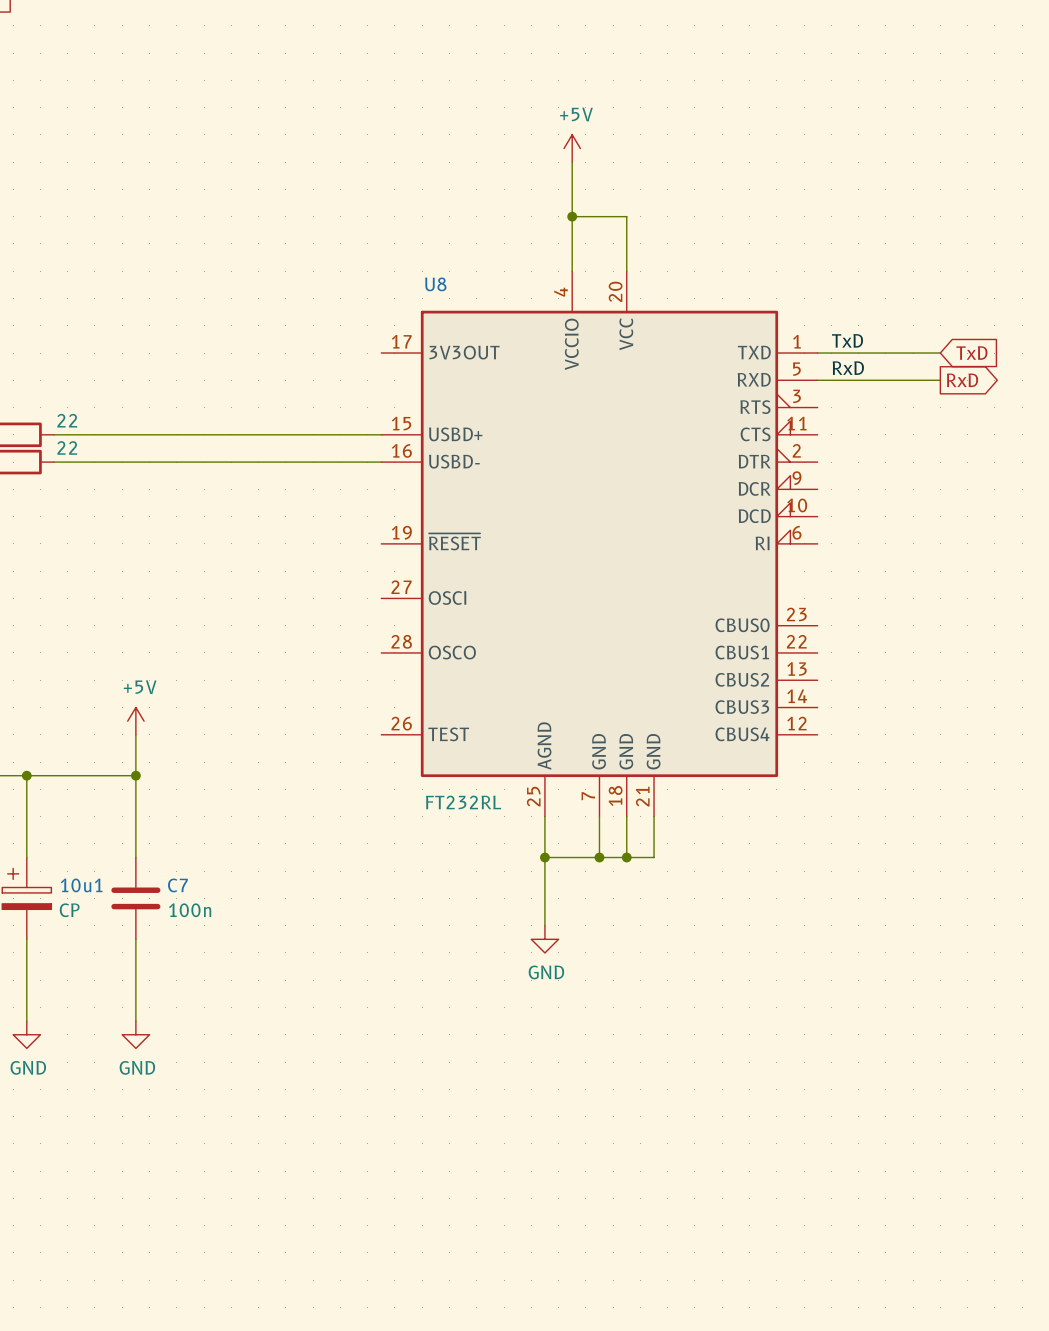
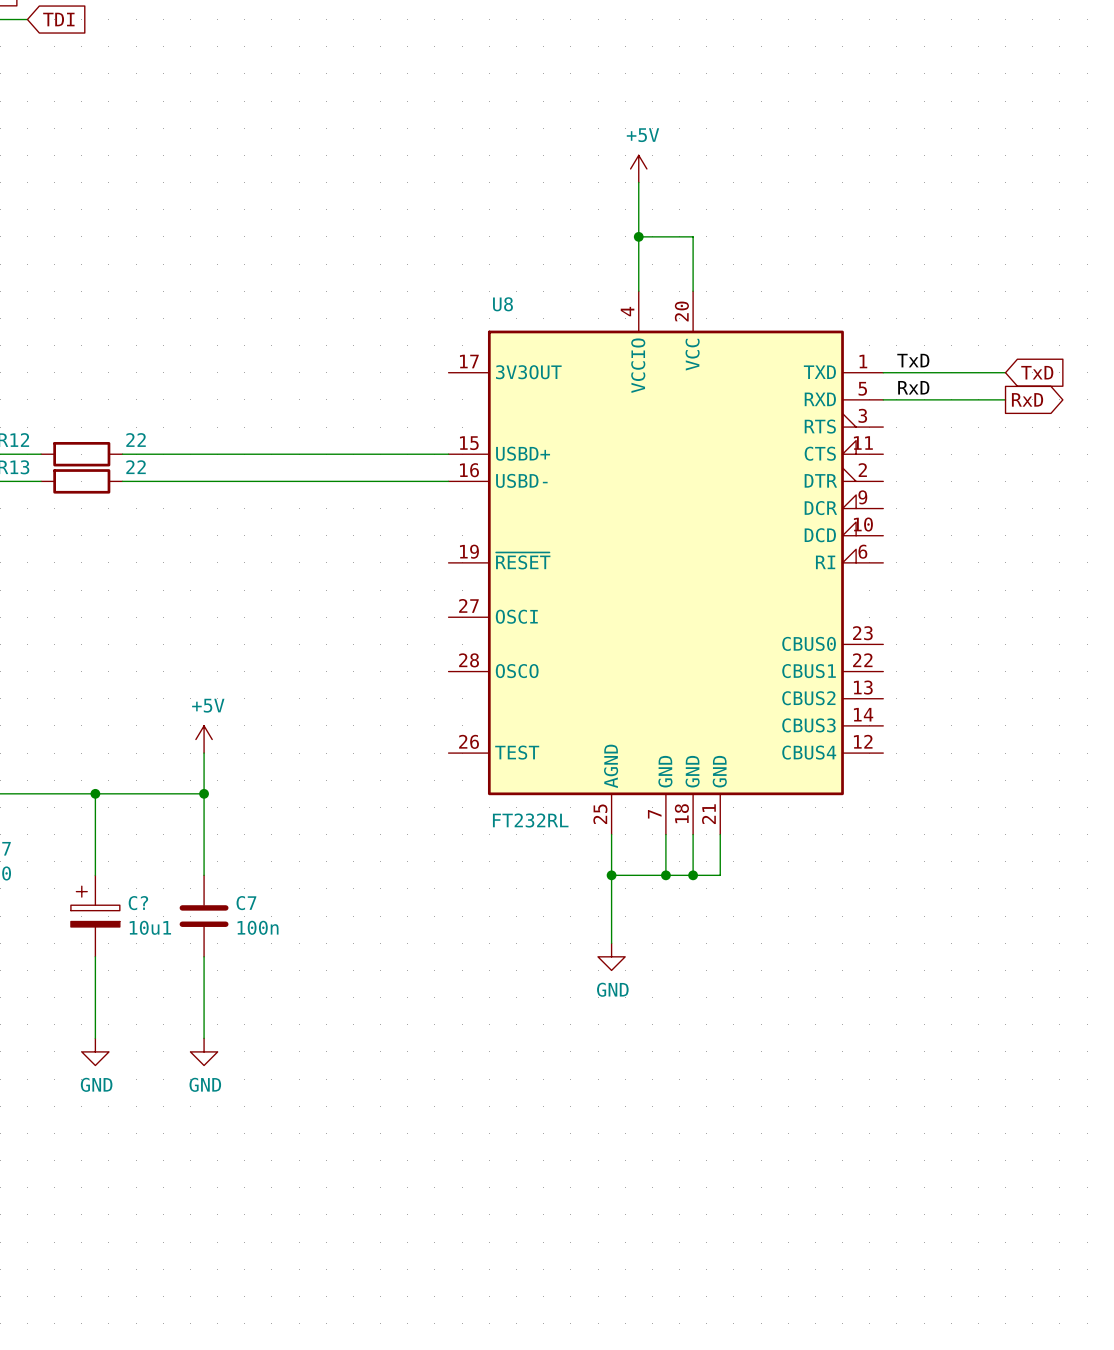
10u1 name: 10u1 (81, 885) -> C? (138, 903)
10u1 value: CP (69, 910) -> 10u1 (150, 927)

